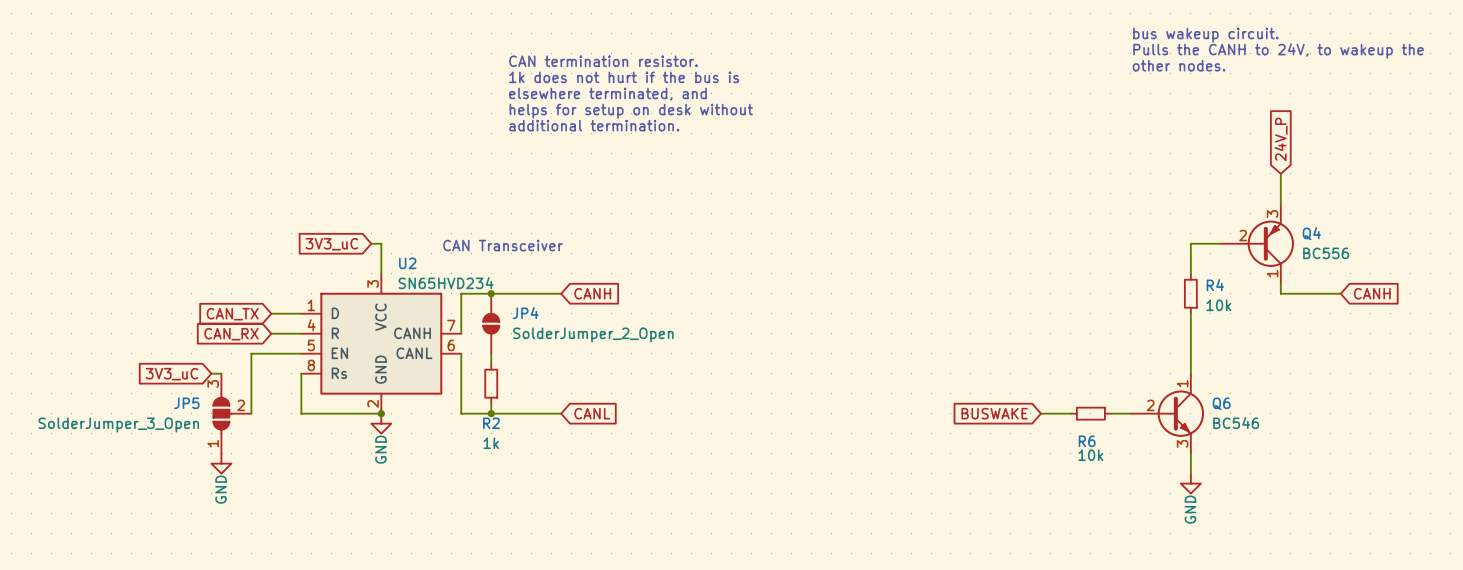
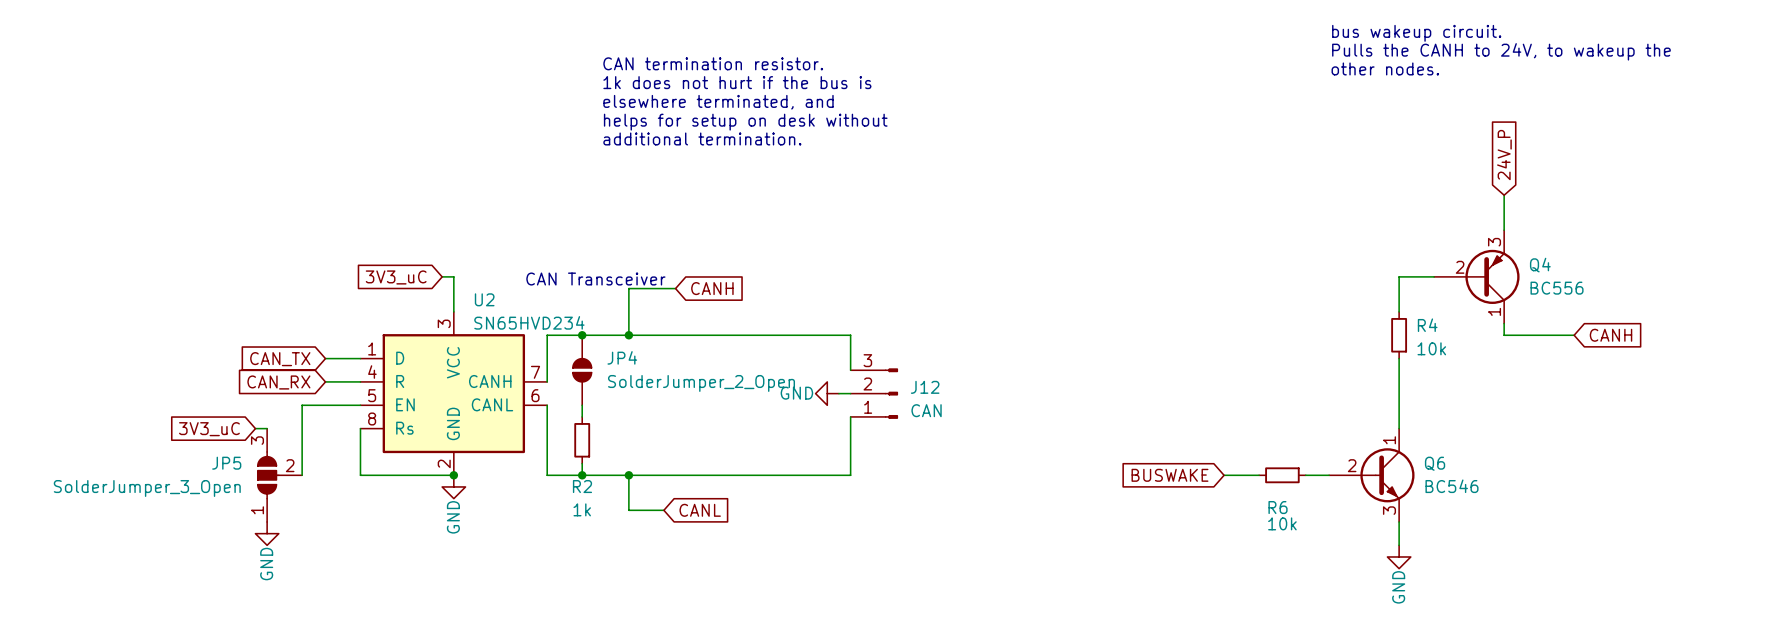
wire: none -> (675, 288) (628, 288) (628, 335)
junction: none -> (628, 335)
wire: none -> (663, 335) (850, 335) (850, 370)
global label position: CANH (592, 293) -> CANH (712, 288)
power symbol: none -> GND (827, 393)
wire: none -> (838, 393) (850, 393)
J12: none -> CAN (874, 393)
wire: none -> (850, 416) (850, 475) (663, 475)
wire: none -> (628, 475) (628, 510) (663, 510)
junction: none -> (628, 475)
global label position: CANL (592, 413) -> CANL (700, 510)

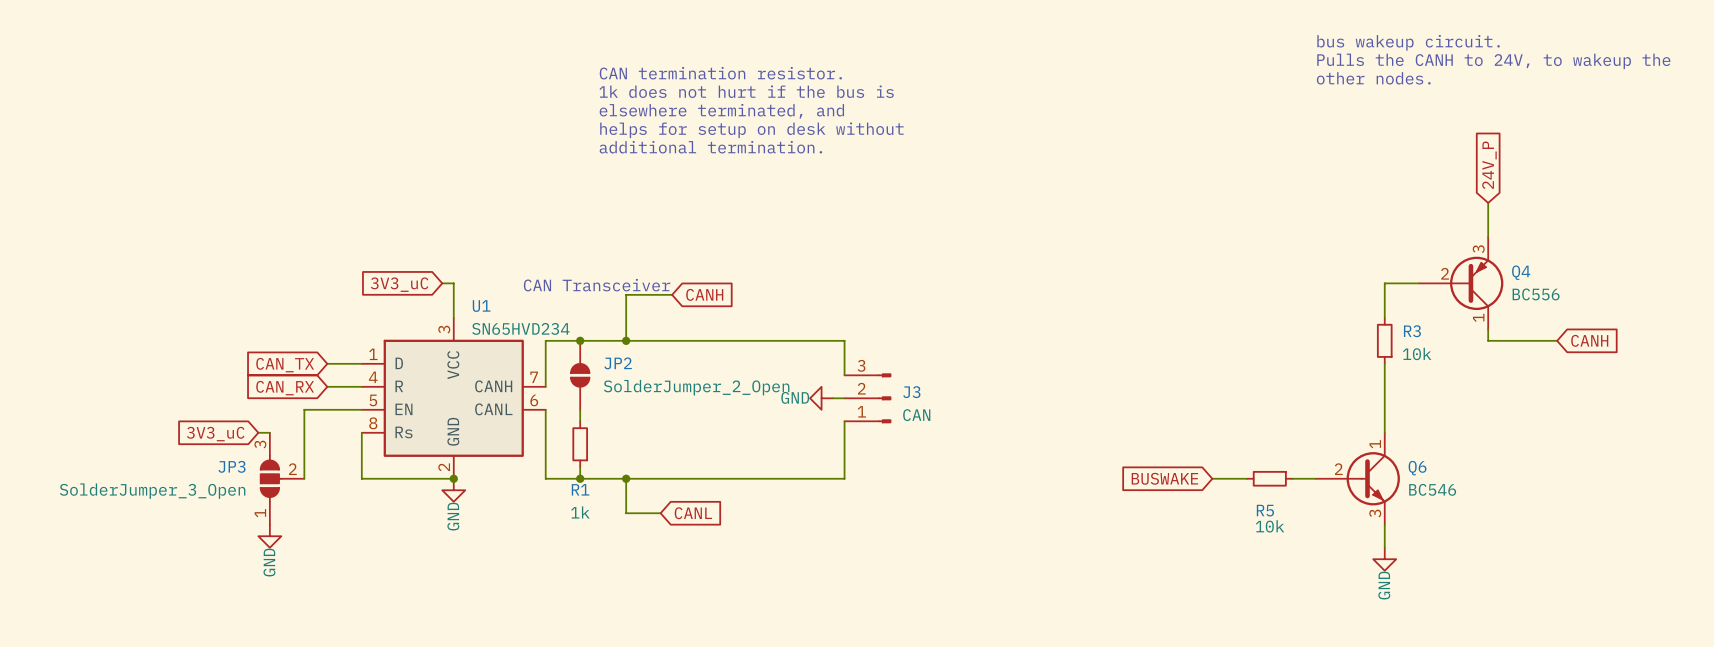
U2 name: U2 (484, 299) -> U1 (481, 306)
R4 name: R4 (1427, 325) -> R3 (1412, 331)
JP4 name: JP4 (622, 357) -> JP2 (618, 363)
J12 name: J12 (925, 387) -> J3 (911, 392)
JP5 name: JP5 (226, 463) -> JP3 (232, 466)
R2 name: R2 (582, 486) -> R1 (580, 489)
R6 name: R6 (1278, 507) -> R5 (1265, 510)

